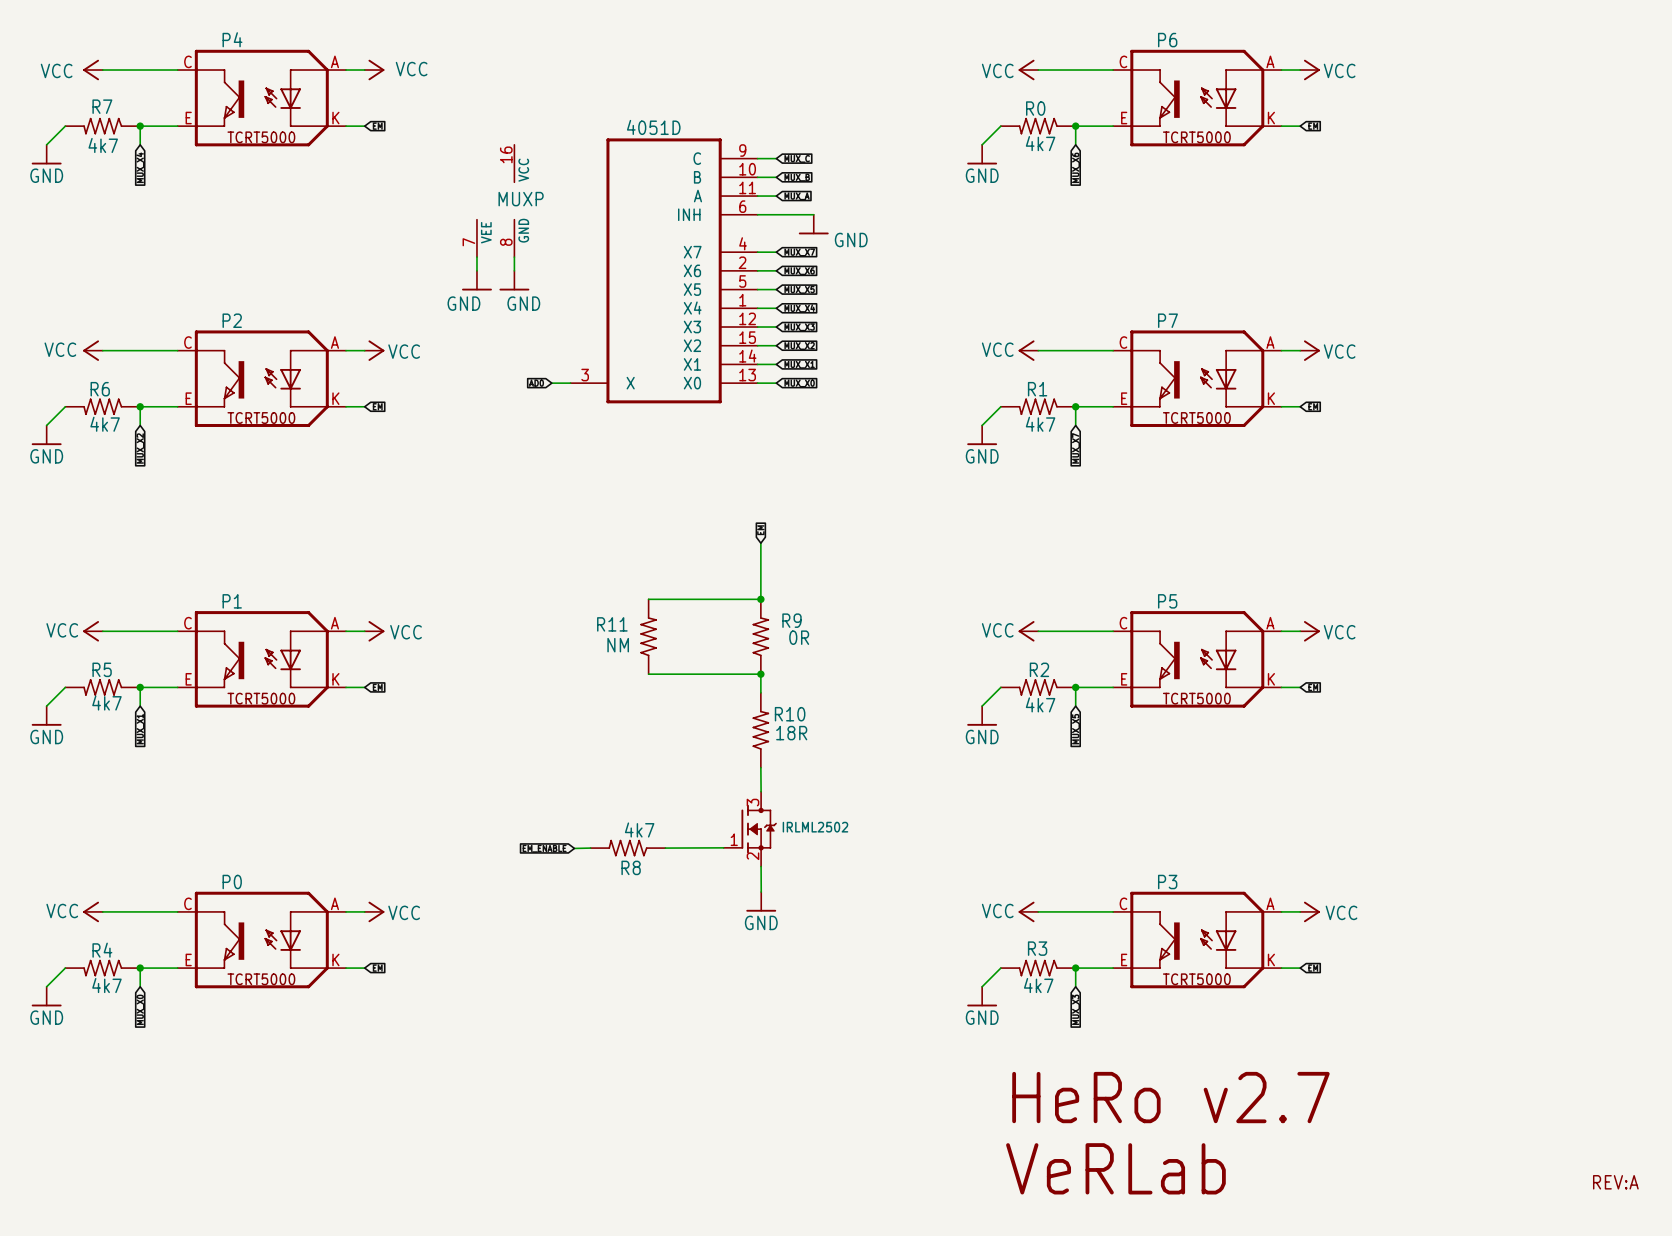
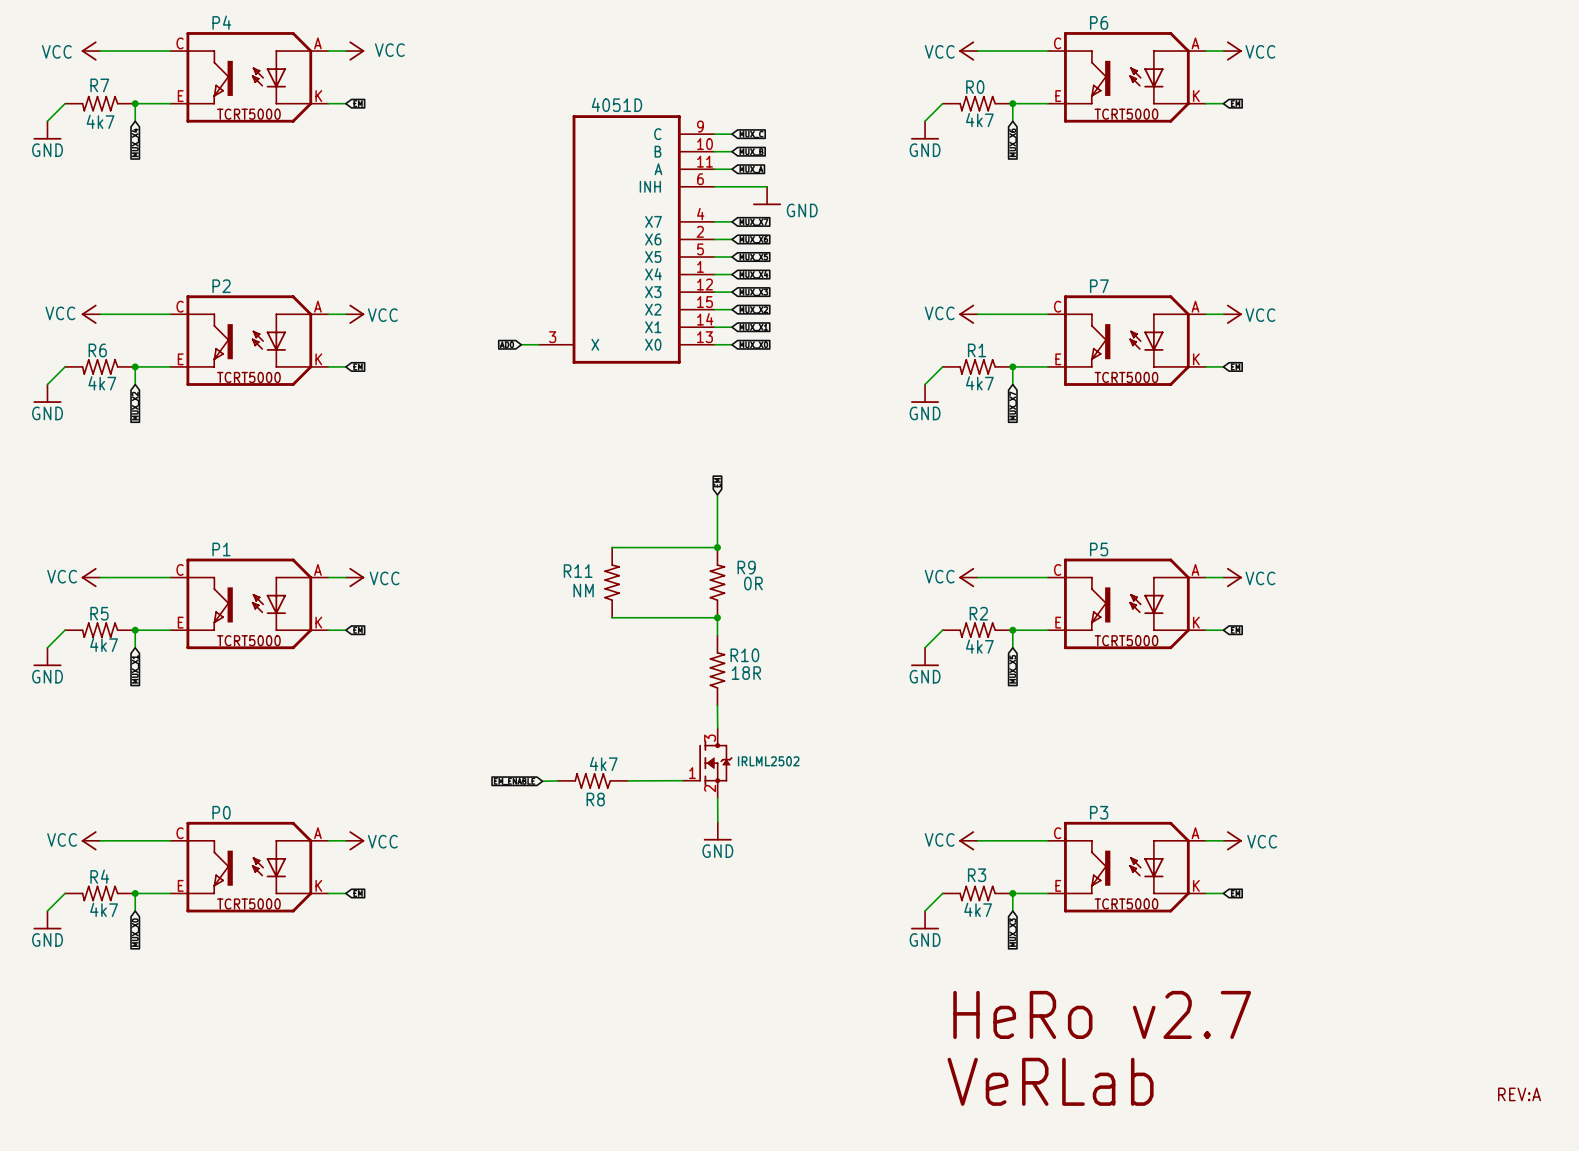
MUXP: (495, 200) -> none
wire: (476, 257) (476, 270) -> none
wire: (514, 257) (514, 270) -> none
power symbol: GND (476, 280) -> none
power symbol: GND (514, 280) -> none

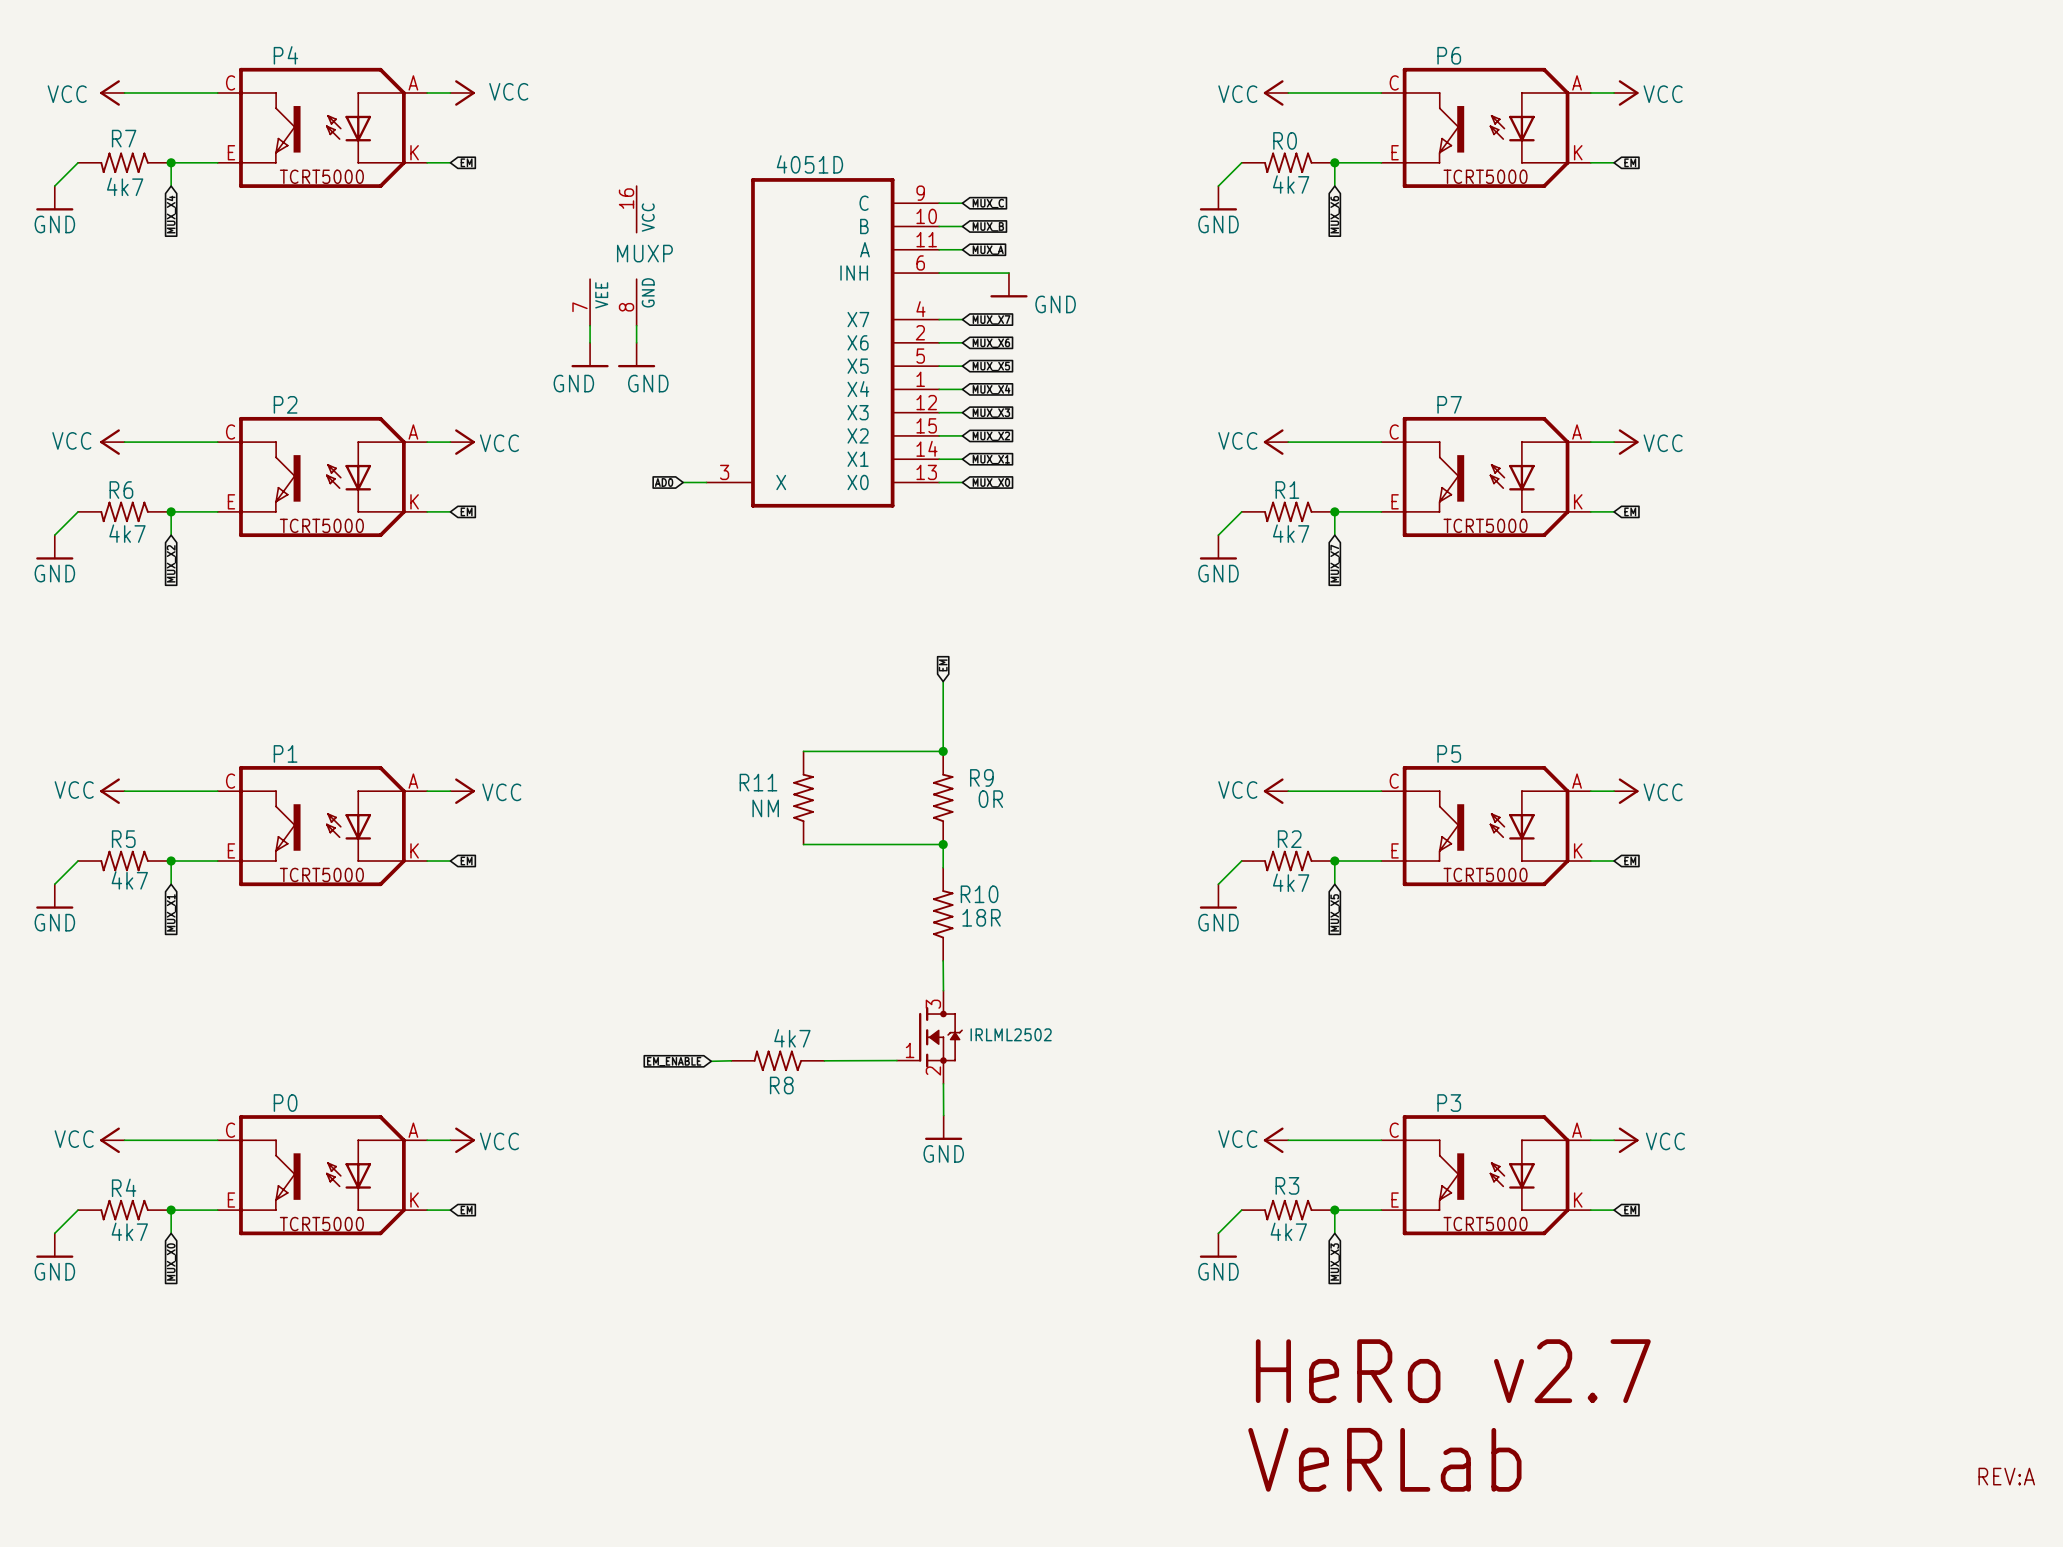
MUXP: none -> (613, 255)
wire: none -> (590, 325) (590, 342)
wire: none -> (636, 325) (636, 342)
power symbol: none -> GND (590, 355)
power symbol: none -> GND (636, 355)

